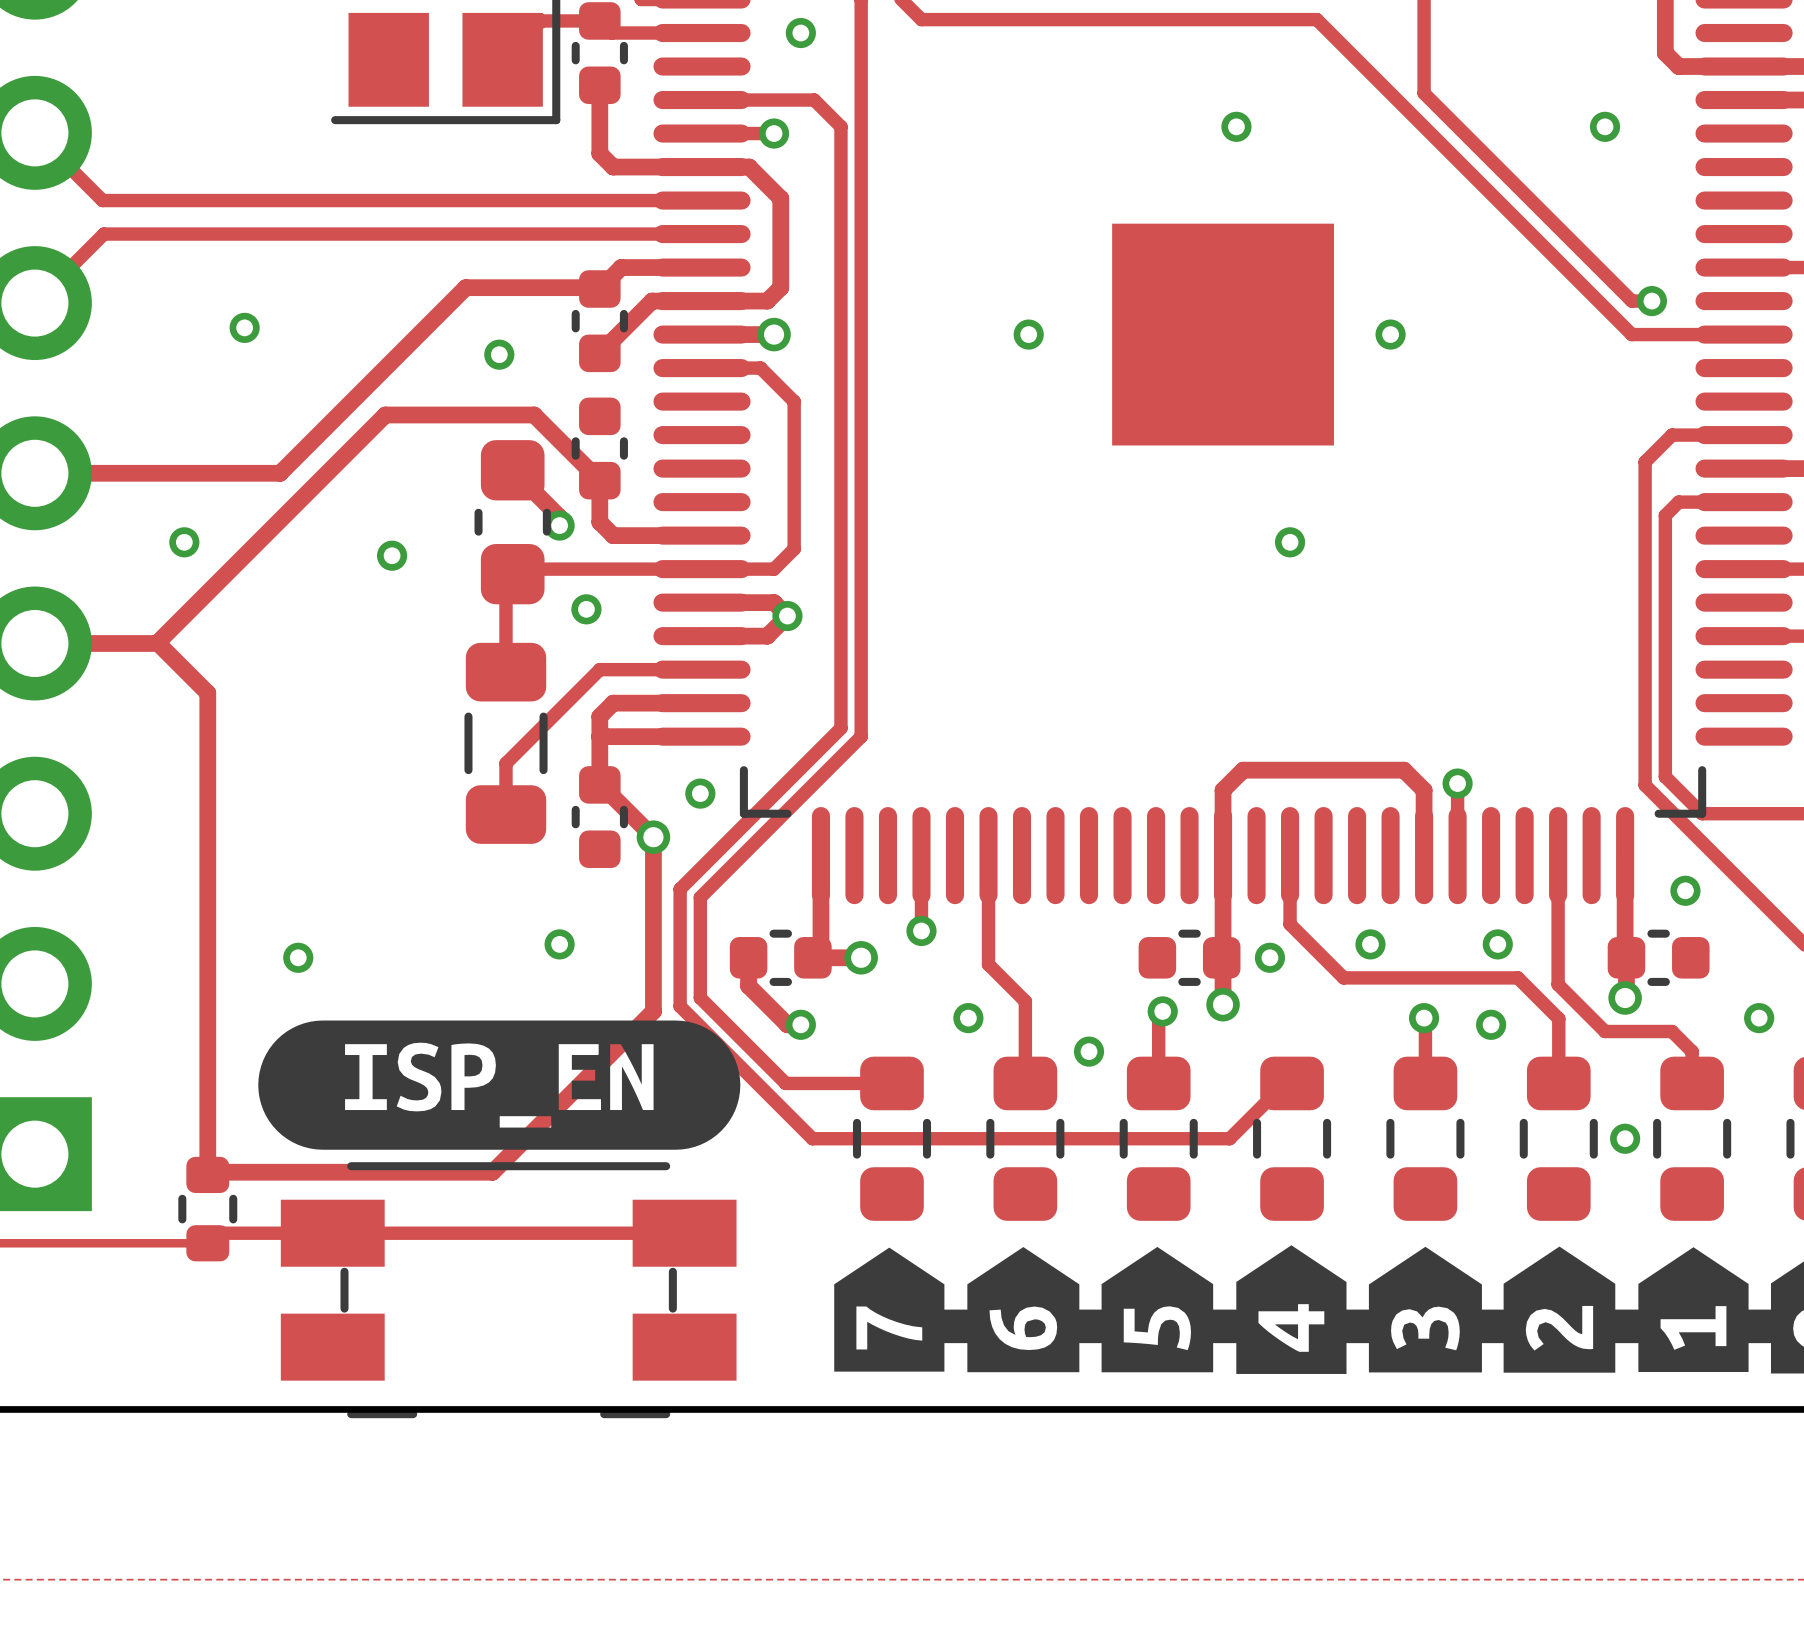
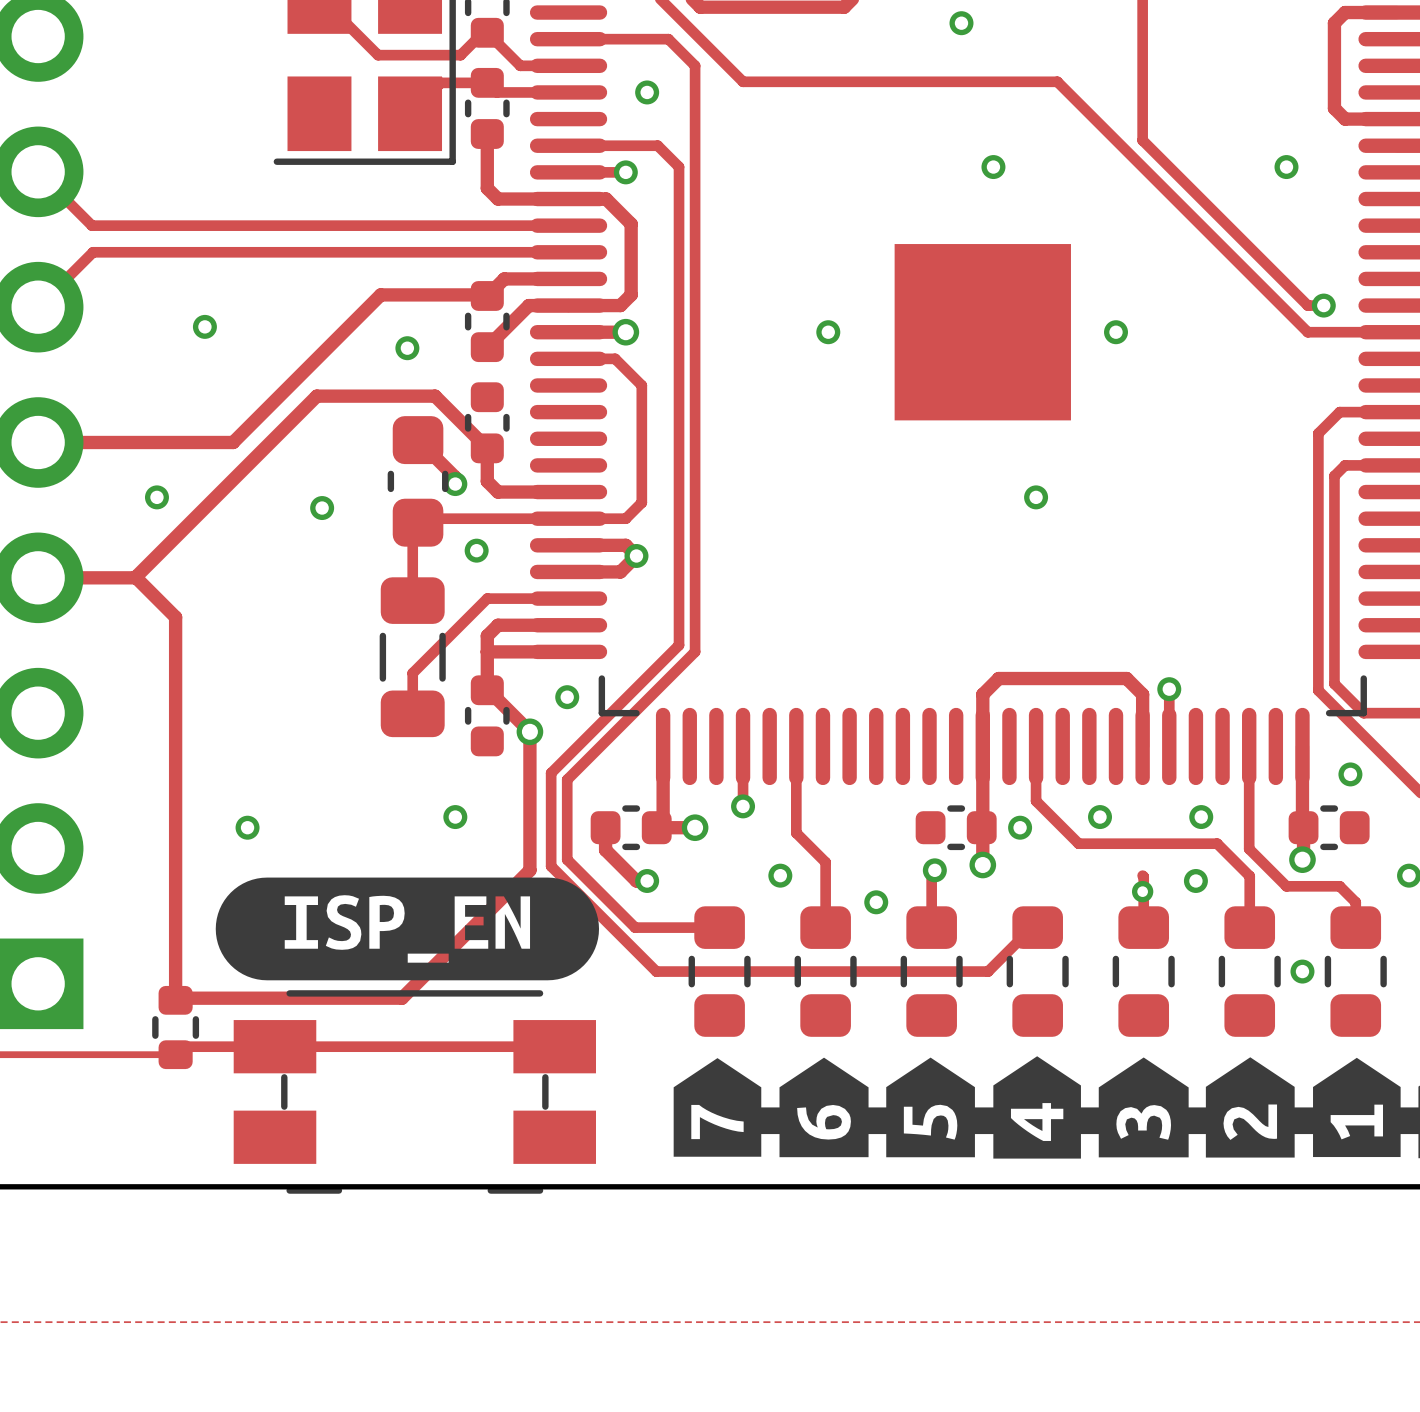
via position: (1424, 1018) -> (1142, 891)

